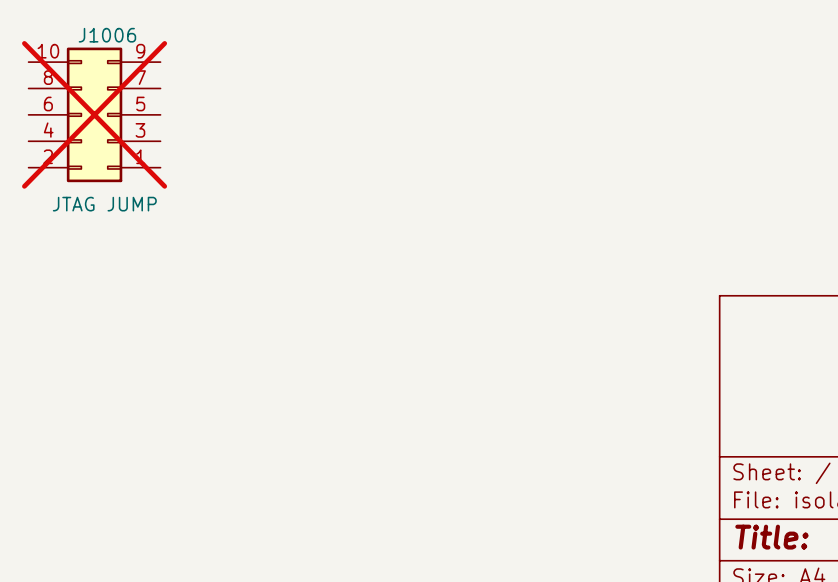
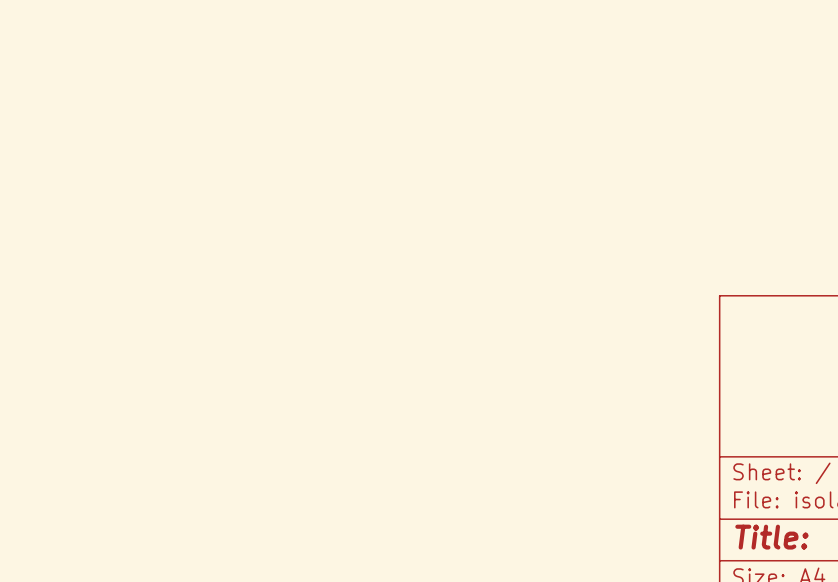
J1006: JTAG JUMP (94, 114) -> none

